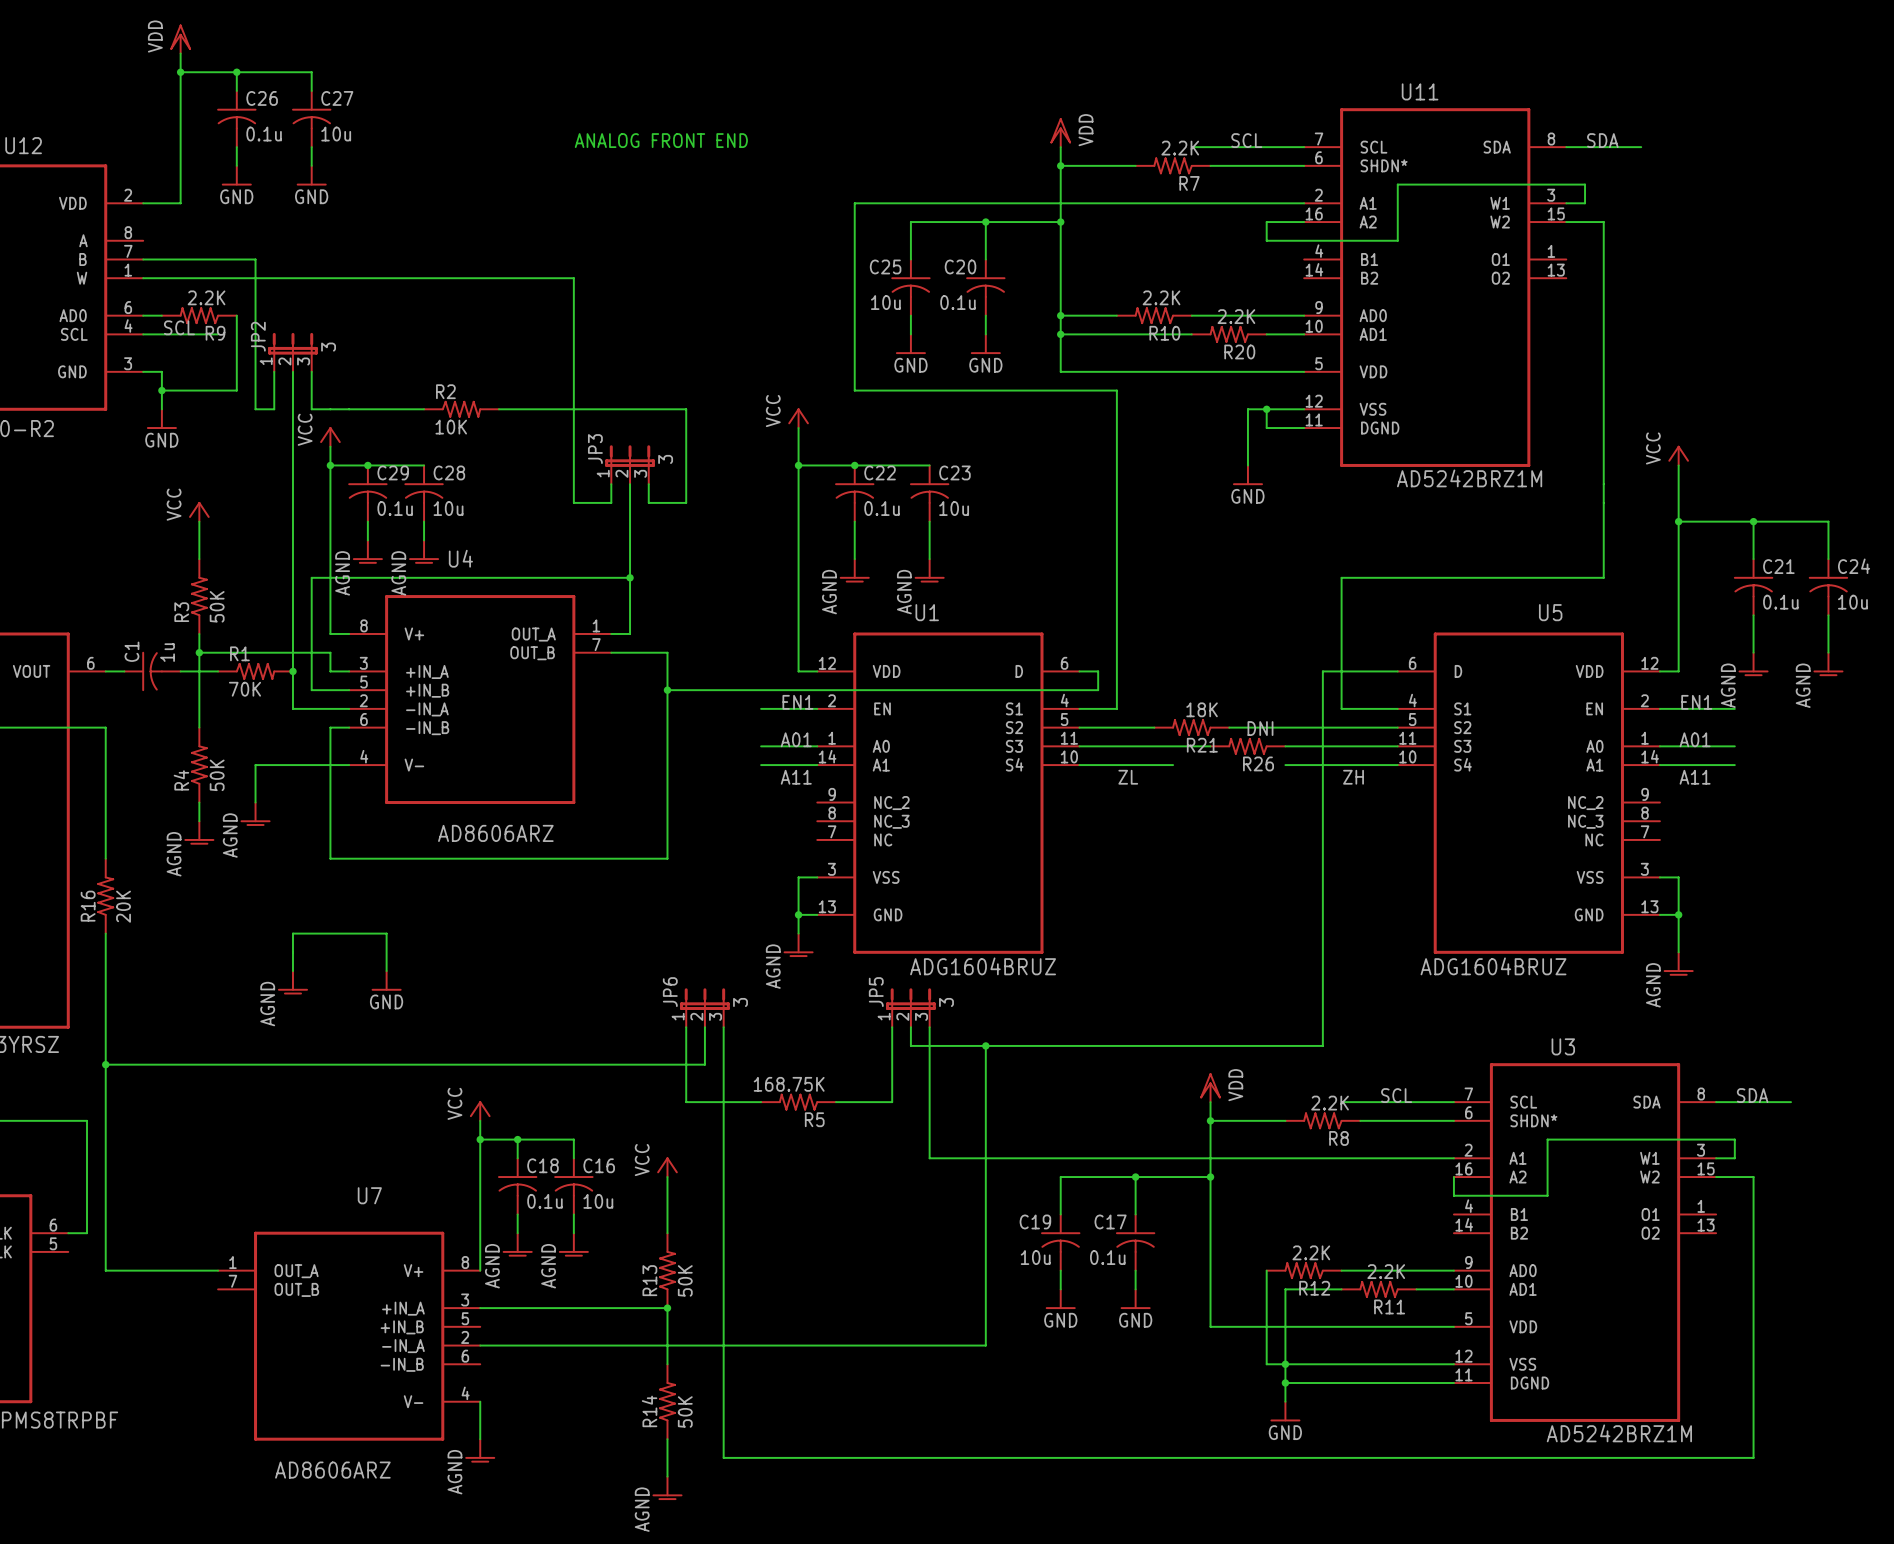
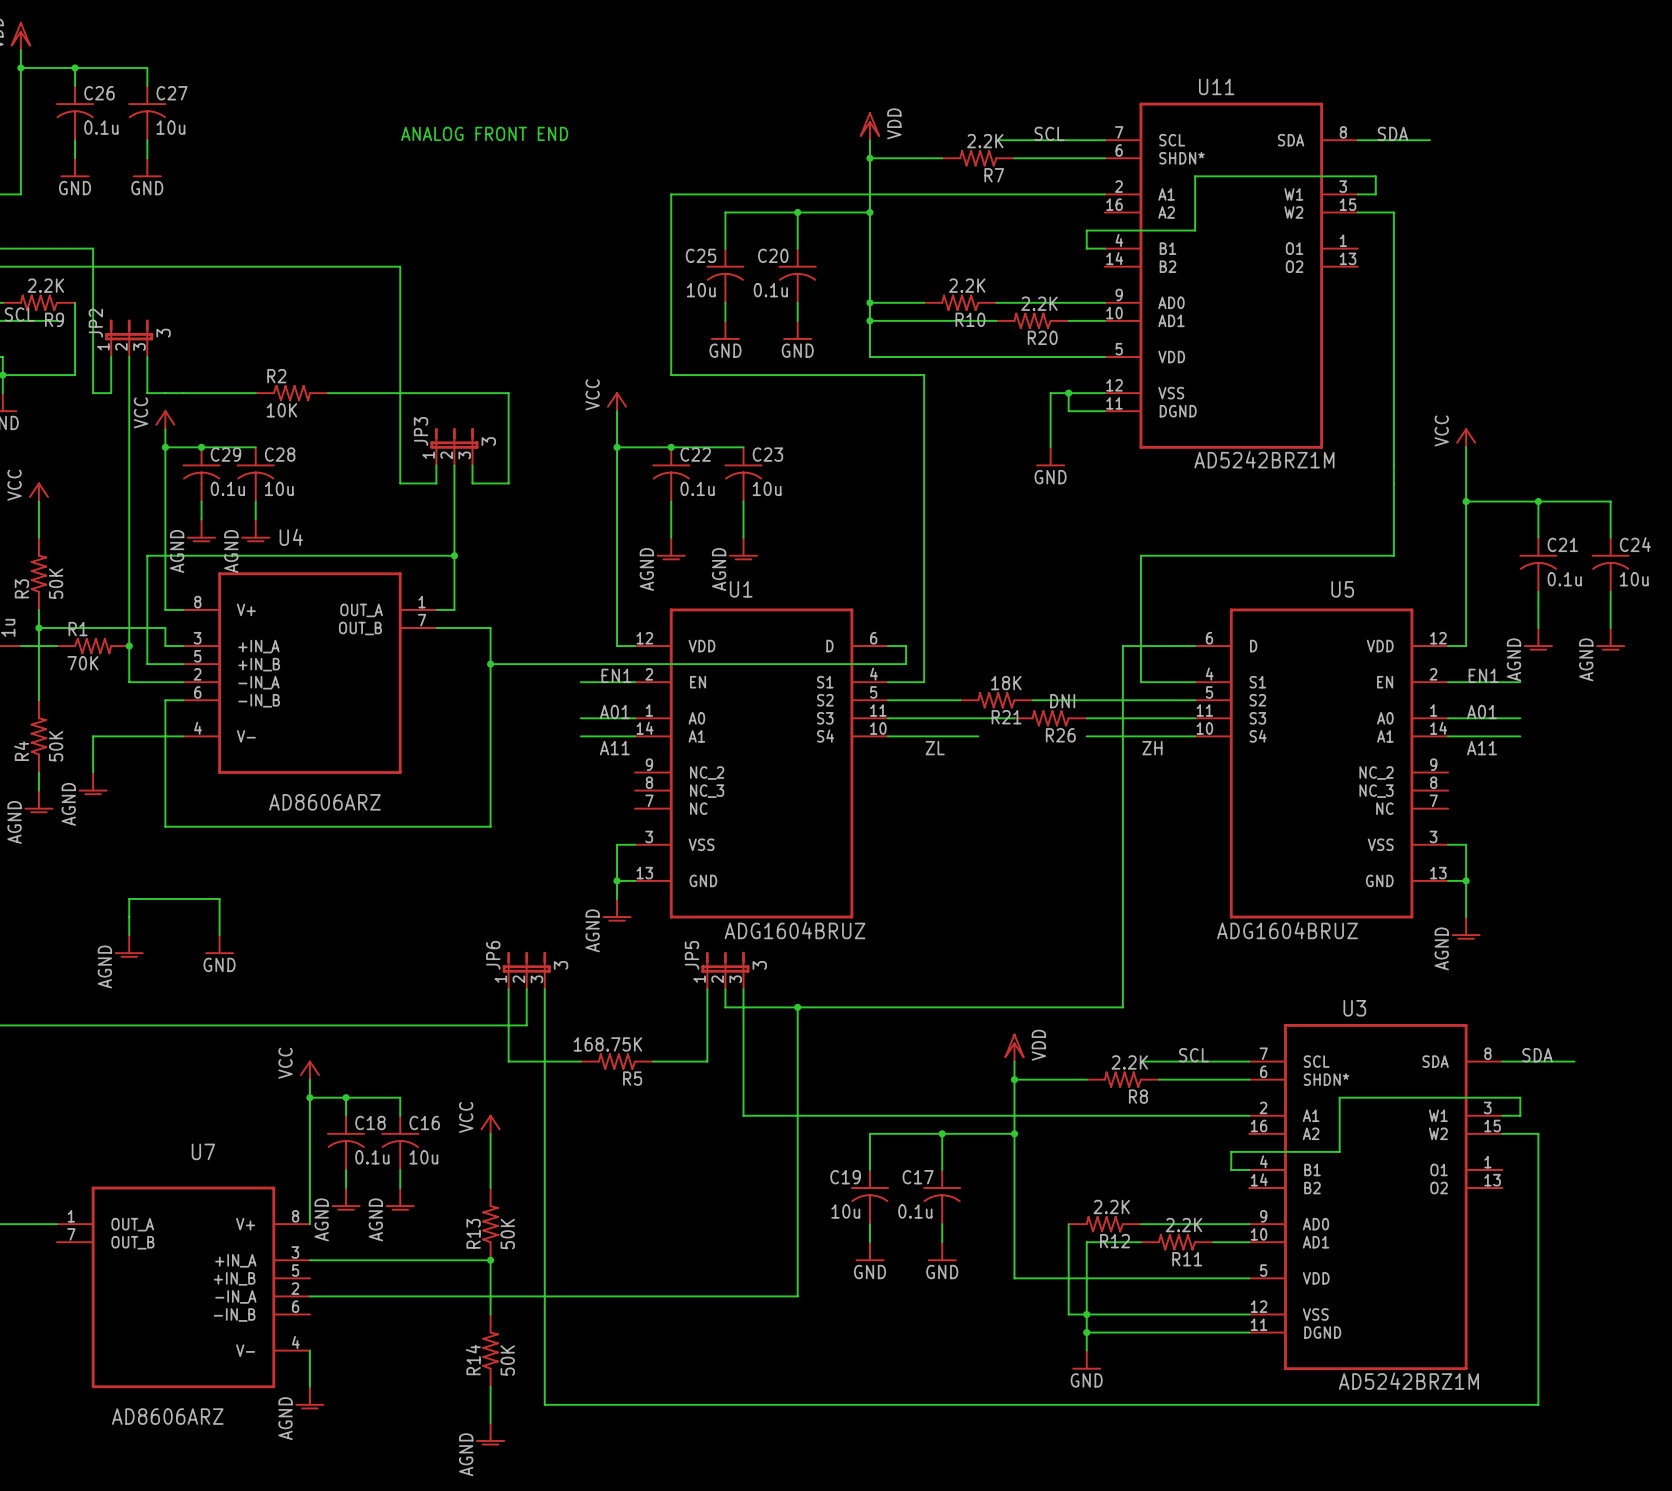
wire: (1304, 222) (1266, 222) (1266, 240) (1285, 240) -> (1104, 248) (1086, 248) (1086, 230)
wire: (1453, 1177) (1453, 1195) -> (1249, 1169) (1231, 1169) (1231, 1151) (1249, 1151)

